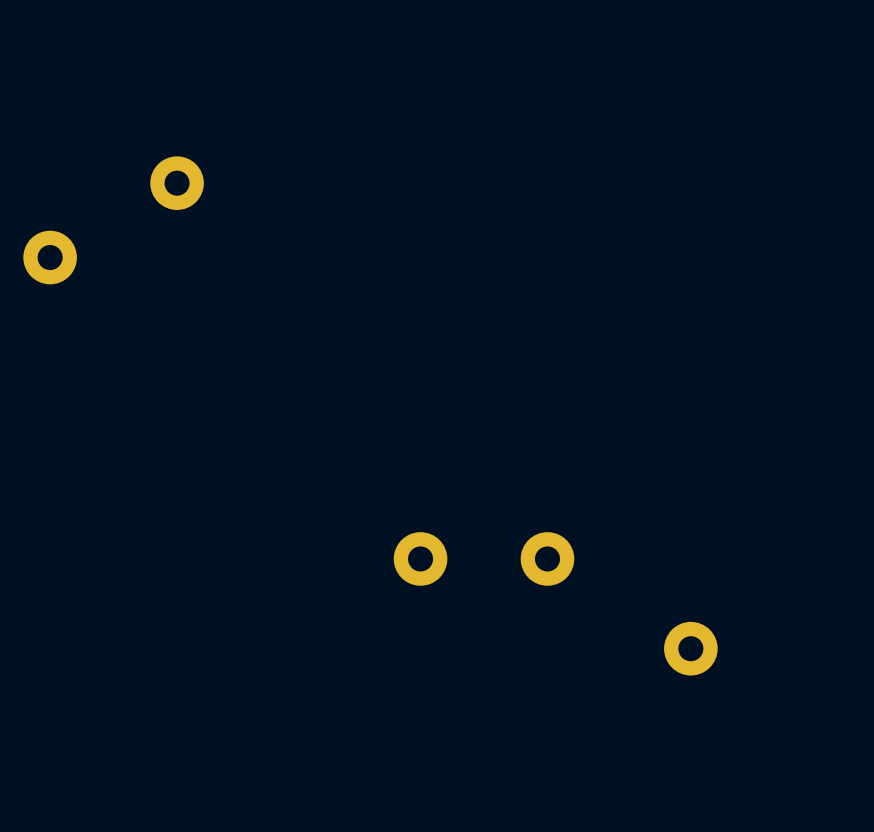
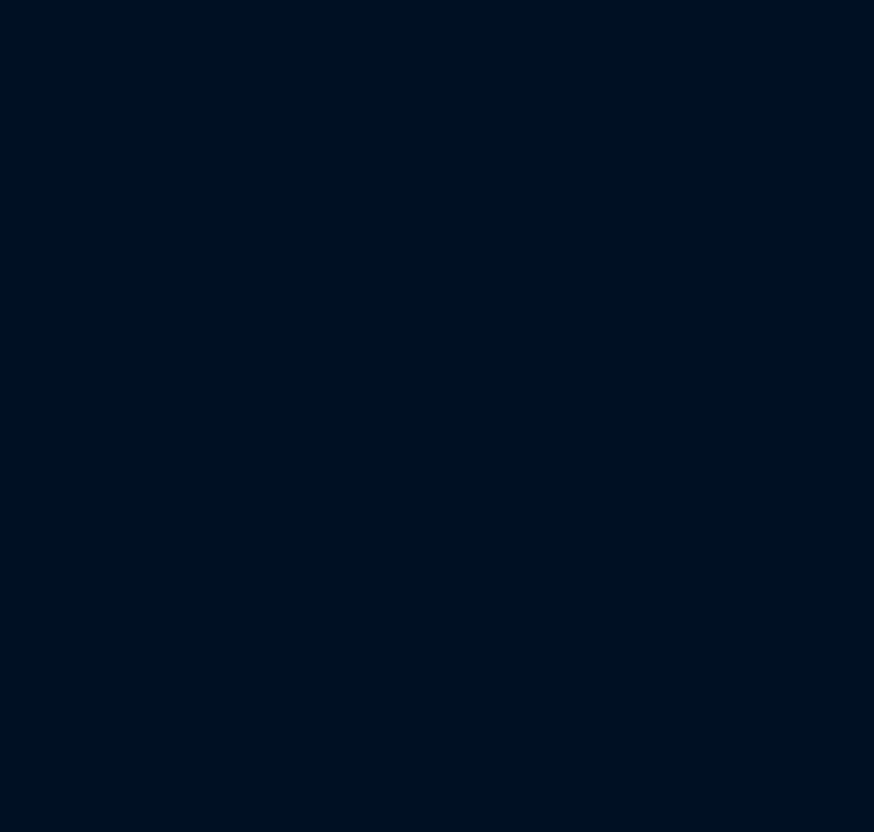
part: (177, 183) -> none
part: (50, 257) -> none
part: (420, 558) -> none
part: (547, 558) -> none
part: (690, 648) -> none

